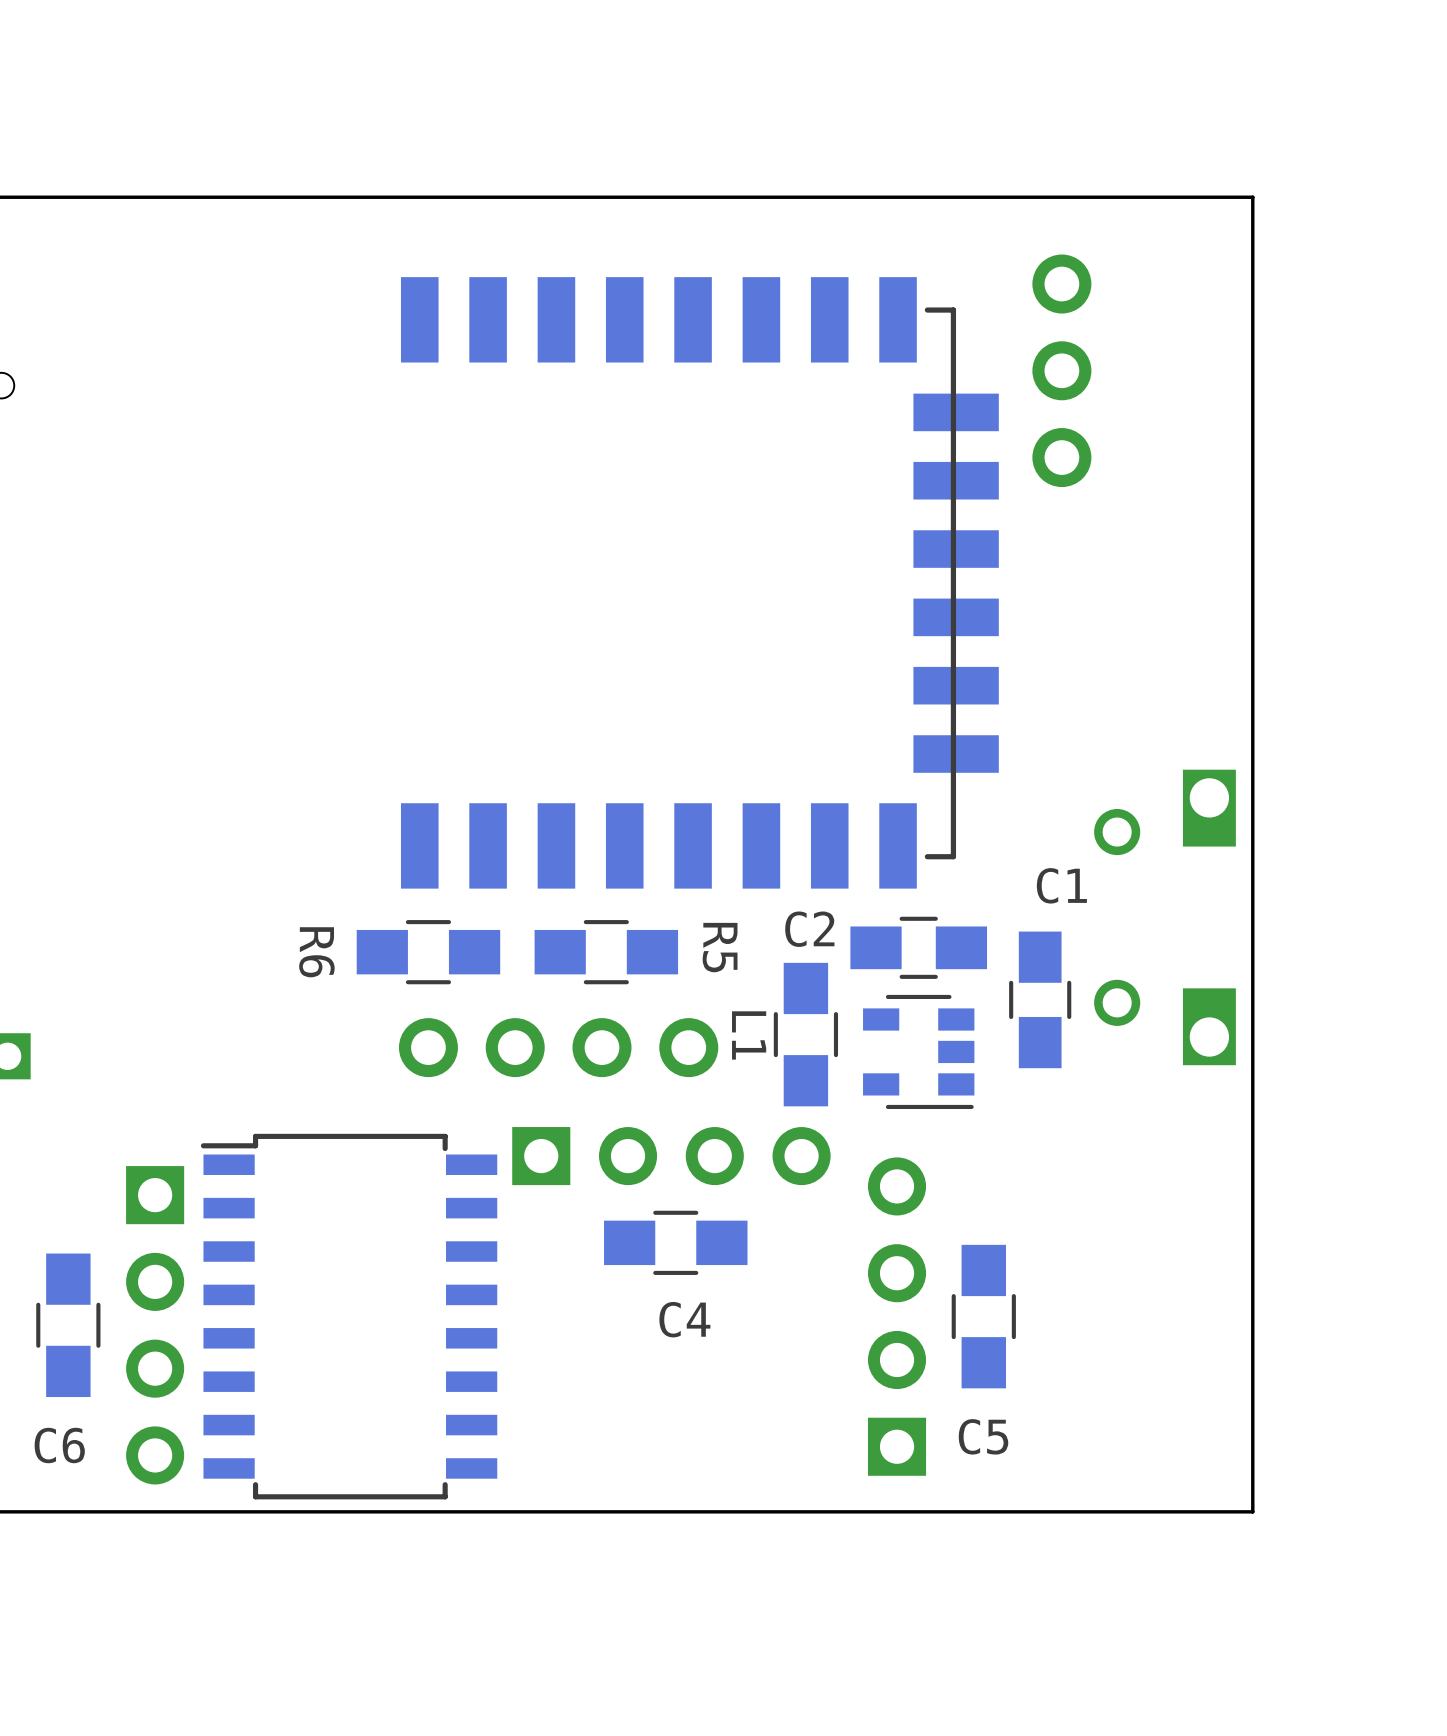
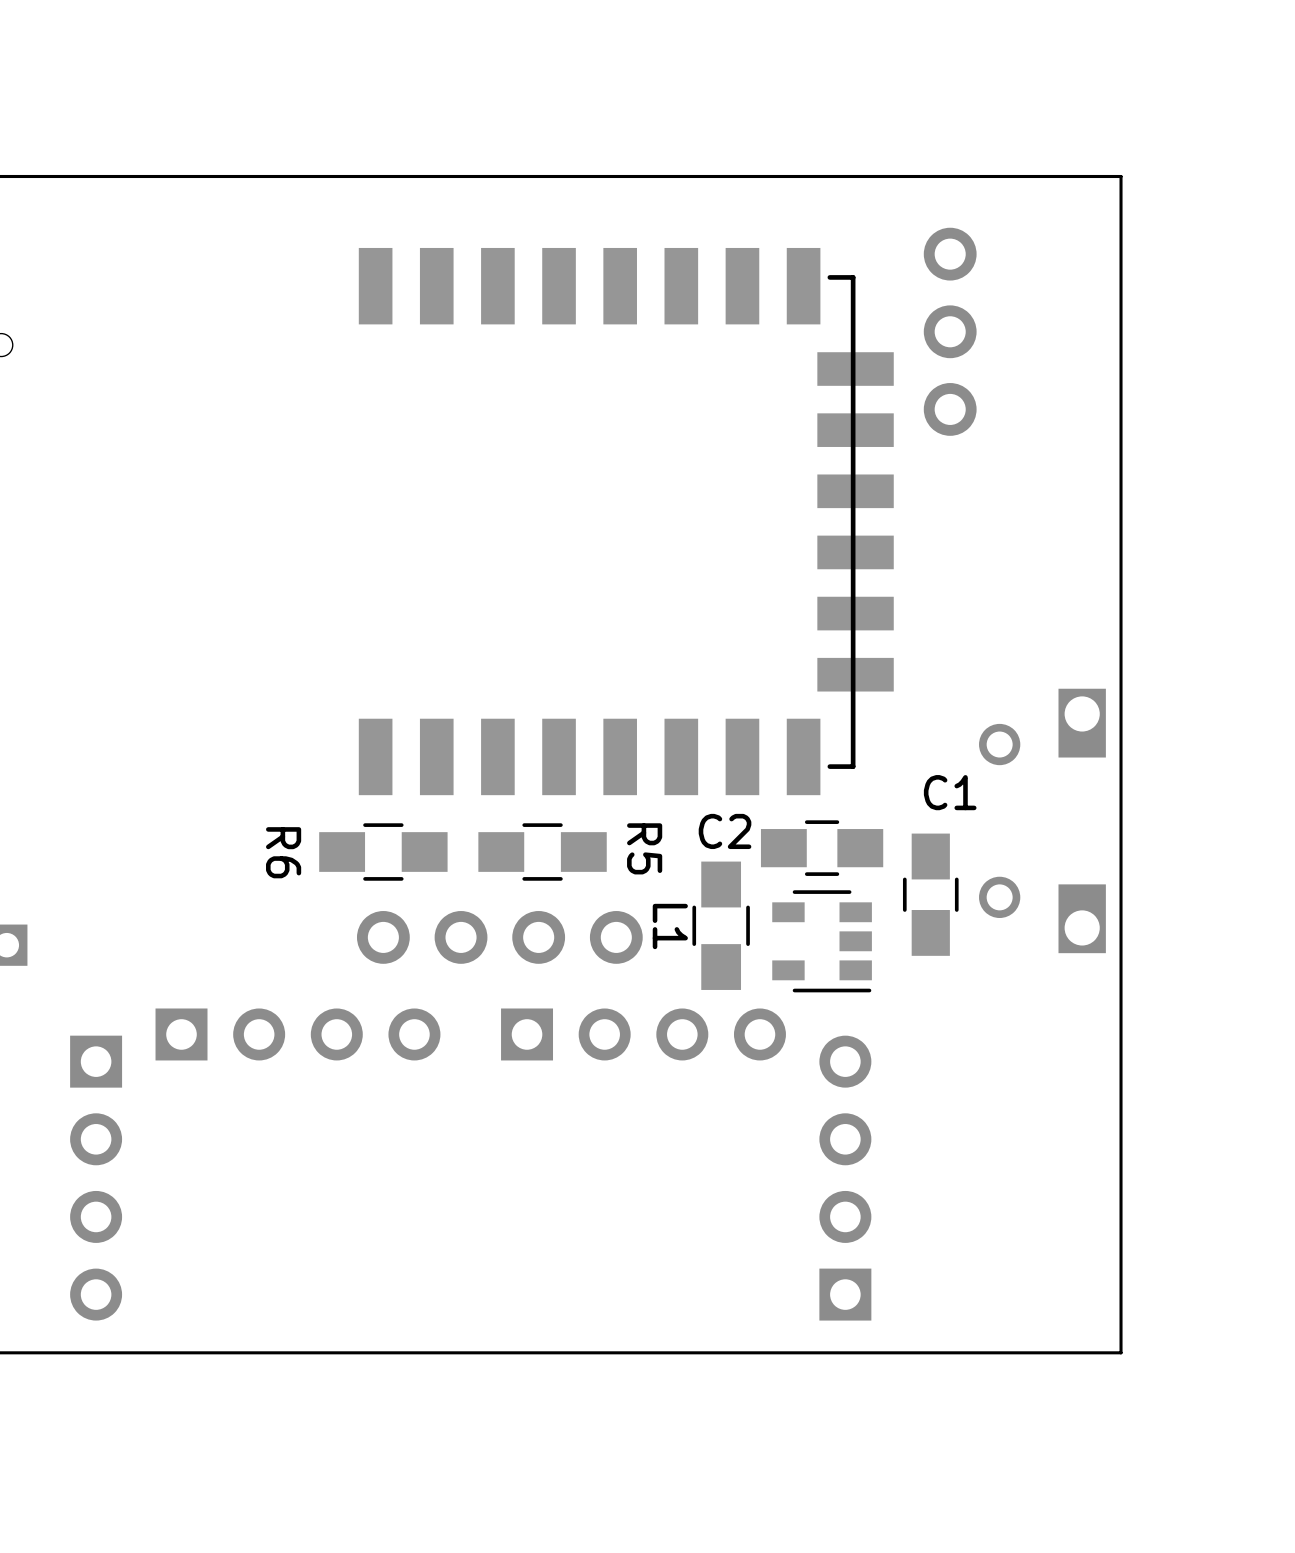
part: none -> (297, 1034)
part position: (671, 1156) -> (643, 1034)
C4: (675, 1242) -> none
part: (349, 1316) -> none
part position: (897, 1316) -> (845, 1178)
C5: (983, 1316) -> none
C6: (68, 1325) -> none
part position: (155, 1325) -> (96, 1178)

